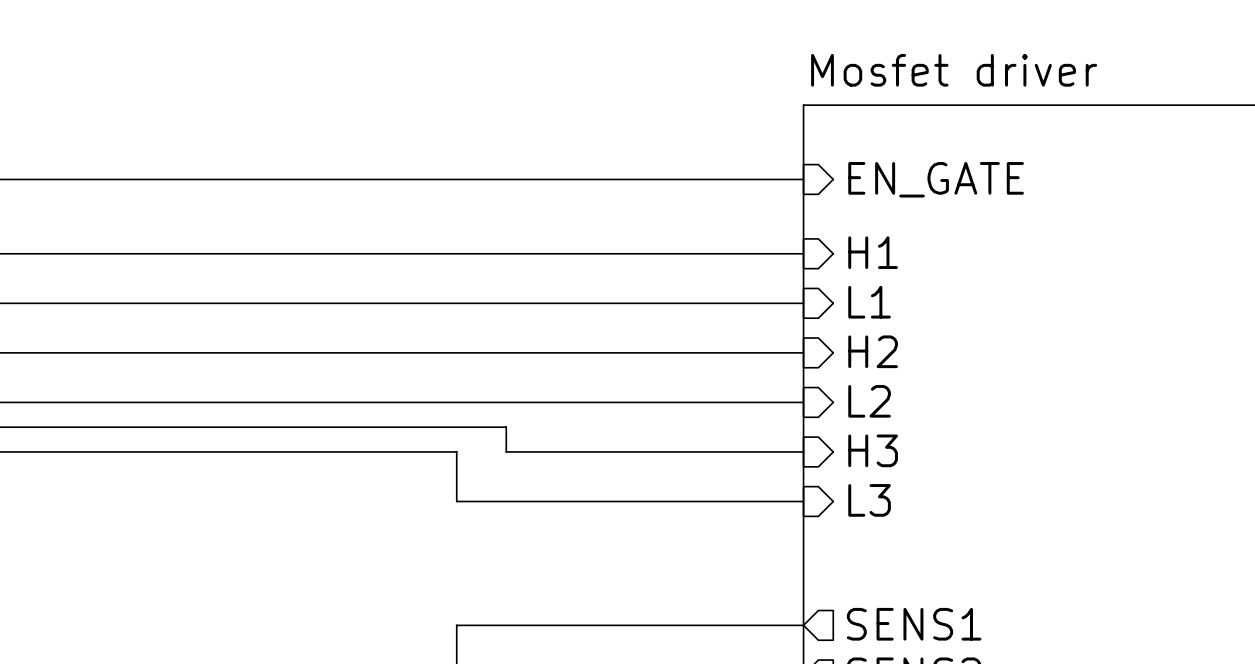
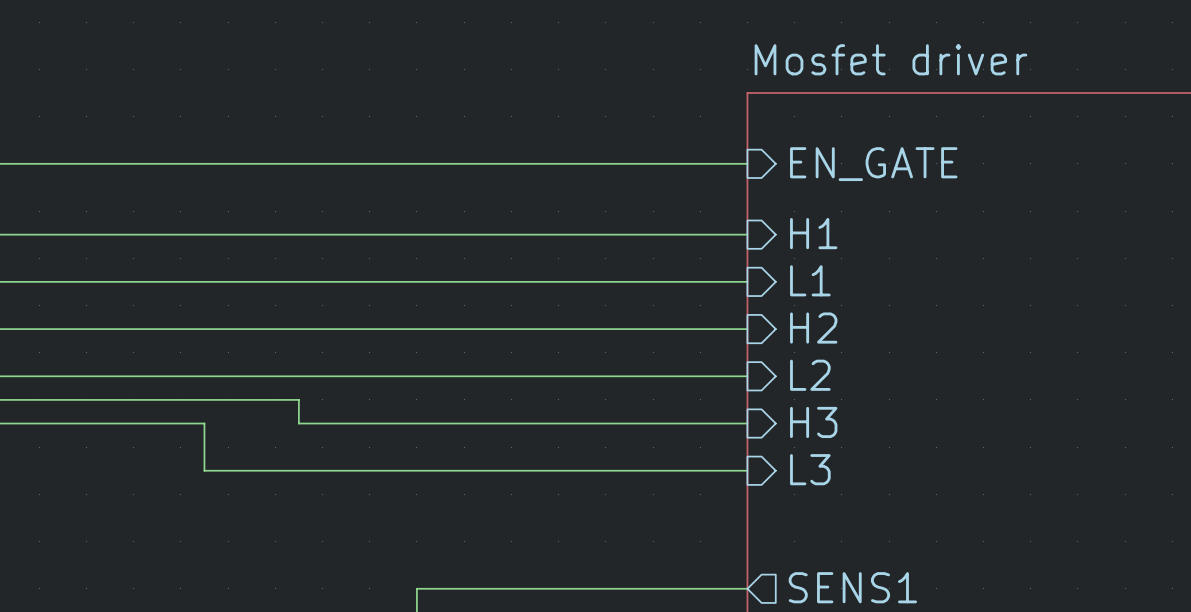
wire: (332, 427) (506, 427) (506, 451) -> none
wire: (233, 451) (332, 451) -> (298, 399) (298, 423)
wire: none -> (204, 423) (204, 470) (416, 470)
wire: (456, 451) (456, 501) -> (416, 423) (464, 423)

